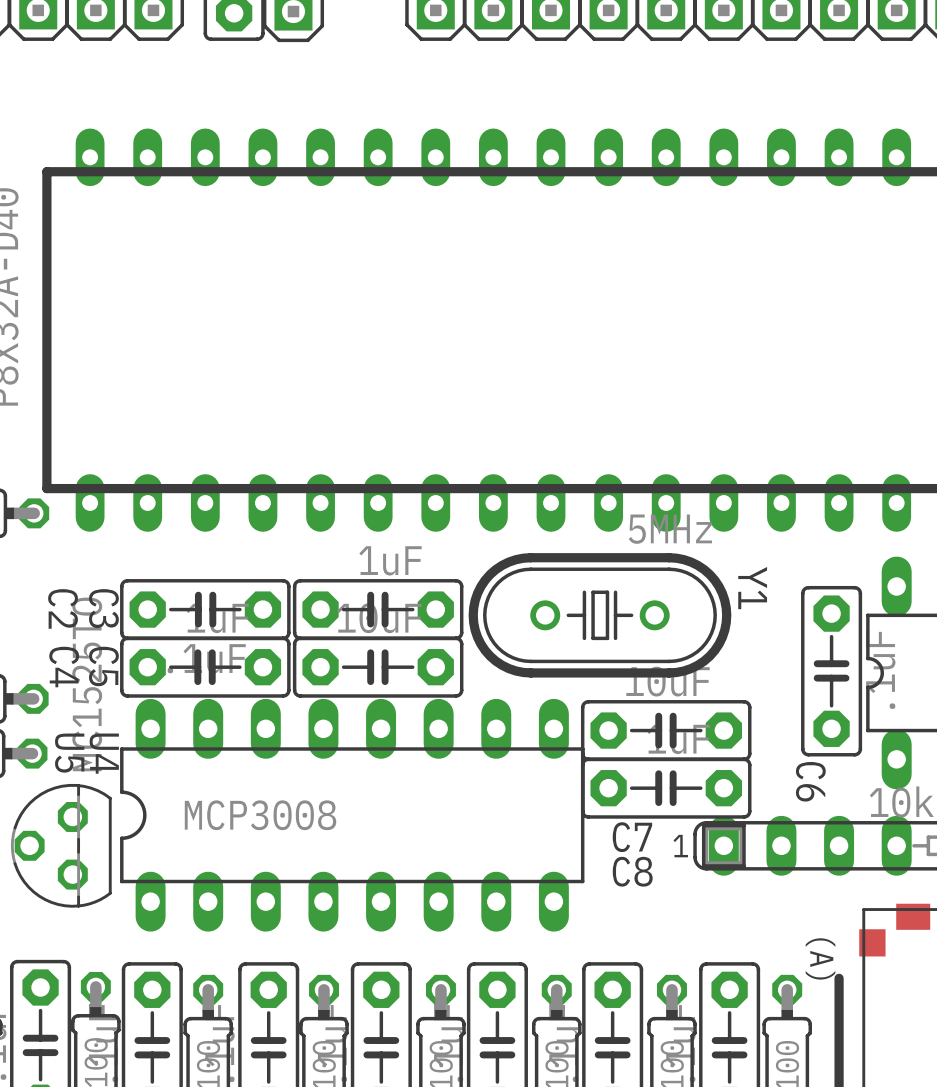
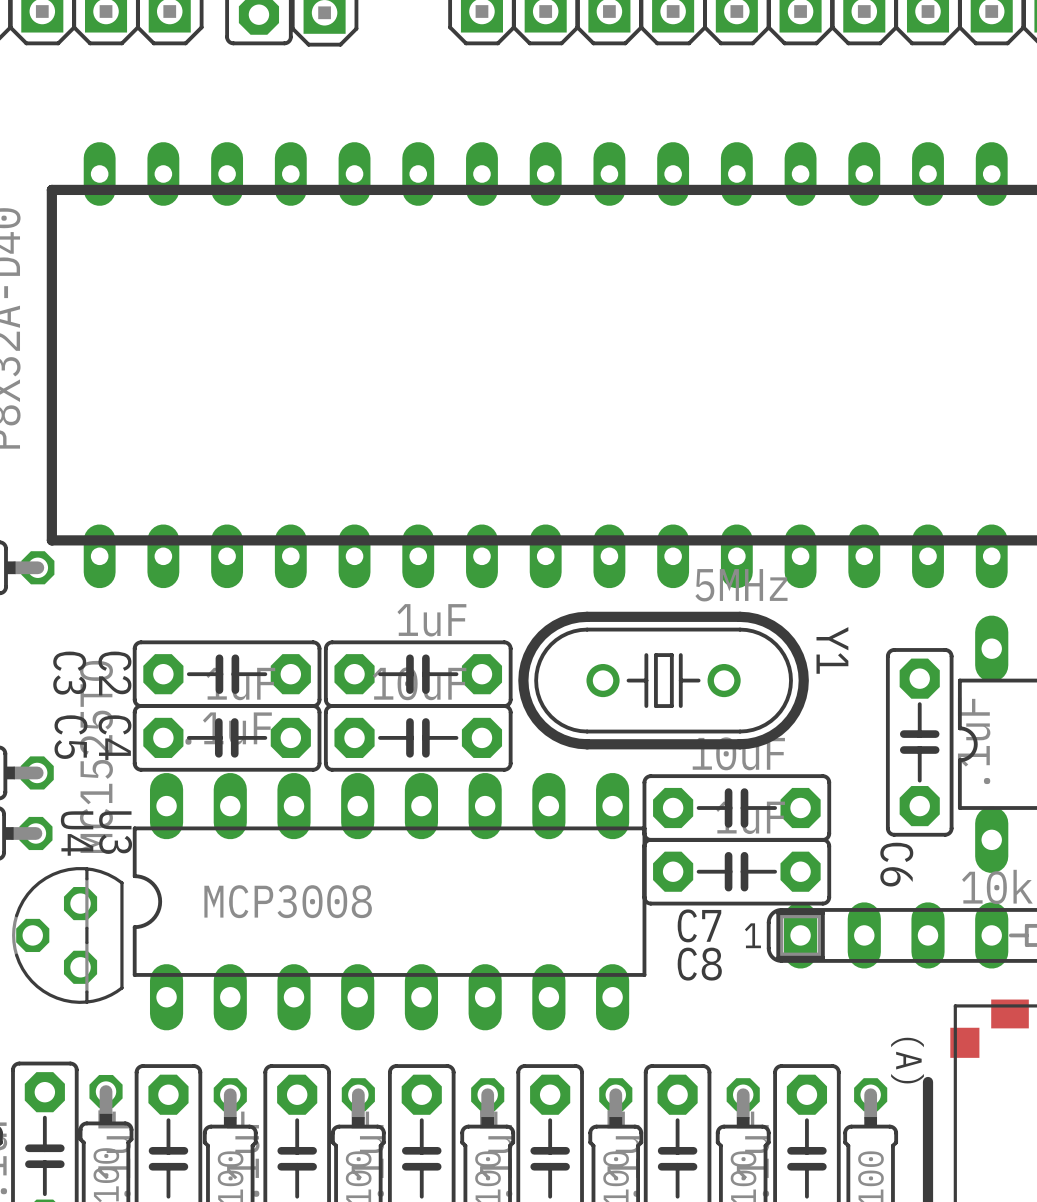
C2 name: C2 (63, 608) -> C3 (69, 673)
C3 name: C3 (103, 608) -> C2 (114, 673)
C5 name: C5 (103, 666) -> C4 (114, 737)
C4 name: C4 (64, 667) -> C5 (70, 737)
U5 name: U5 (69, 753) -> U4 (77, 833)
U4 name: U4 (104, 753) -> U3 (115, 832)

